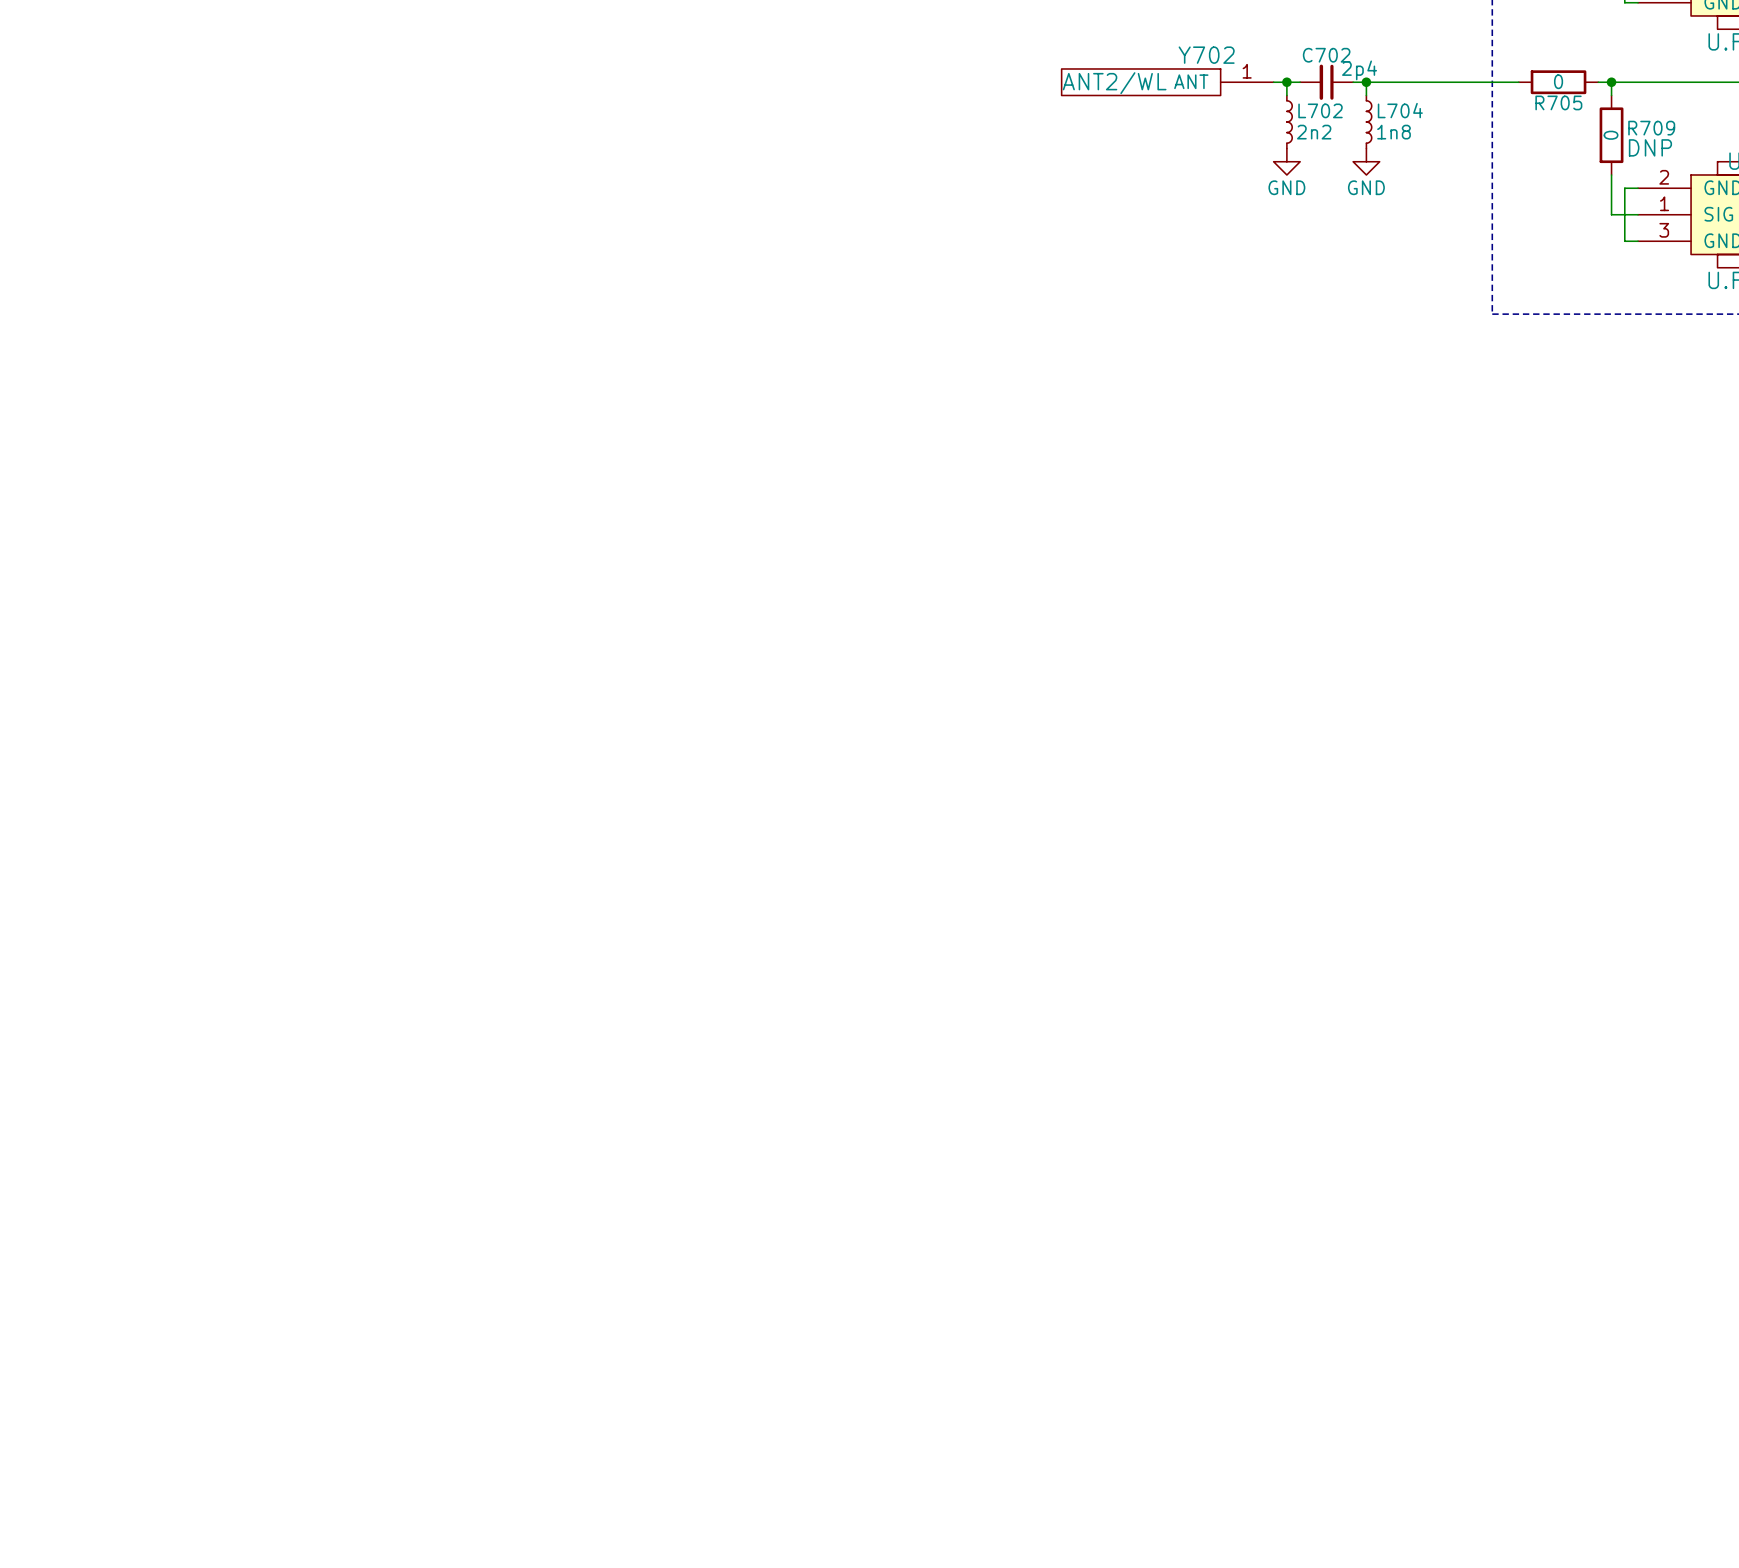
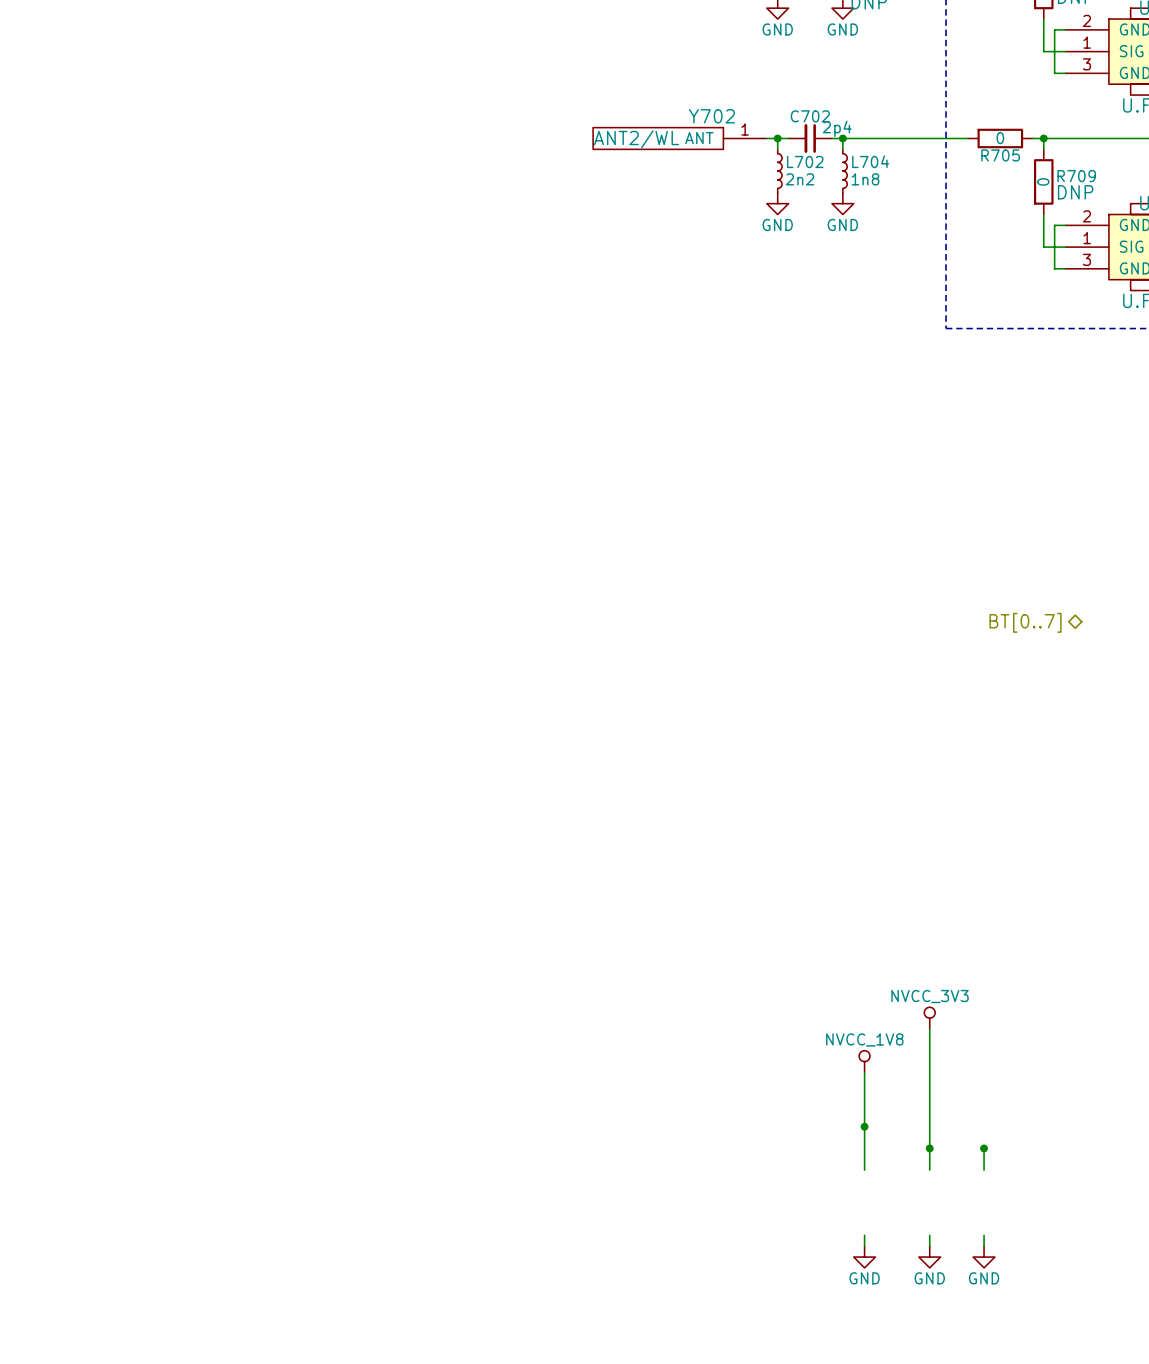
hierarchical label: none -> BT[0..7] (1025, 622)
power symbol: none -> NVCC_3V3 (929, 1018)
wire: none -> (929, 1028) (929, 1170)
power symbol: none -> NVCC_1V8 (864, 1061)
wire: none -> (864, 1072) (864, 1170)
junction: none -> (864, 1126)
junction: none -> (929, 1148)
wire: none -> (984, 1148) (984, 1170)
junction: none -> (984, 1148)
wire: none -> (864, 1235) (864, 1246)
wire: none -> (929, 1235) (929, 1246)
wire: none -> (984, 1235) (984, 1246)
power symbol: none -> GND (864, 1257)
power symbol: none -> GND (929, 1257)
power symbol: none -> GND (984, 1257)

